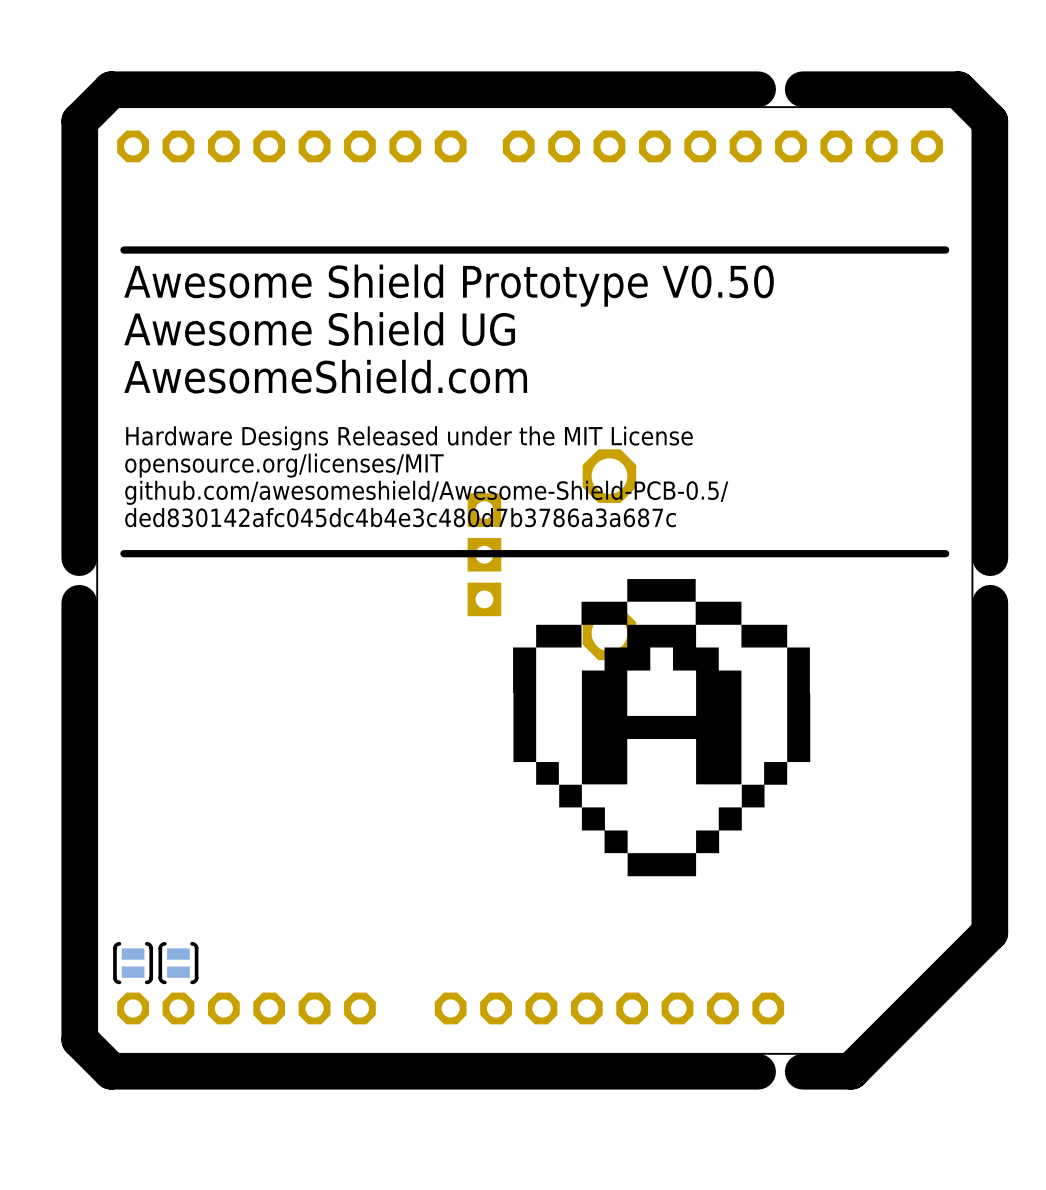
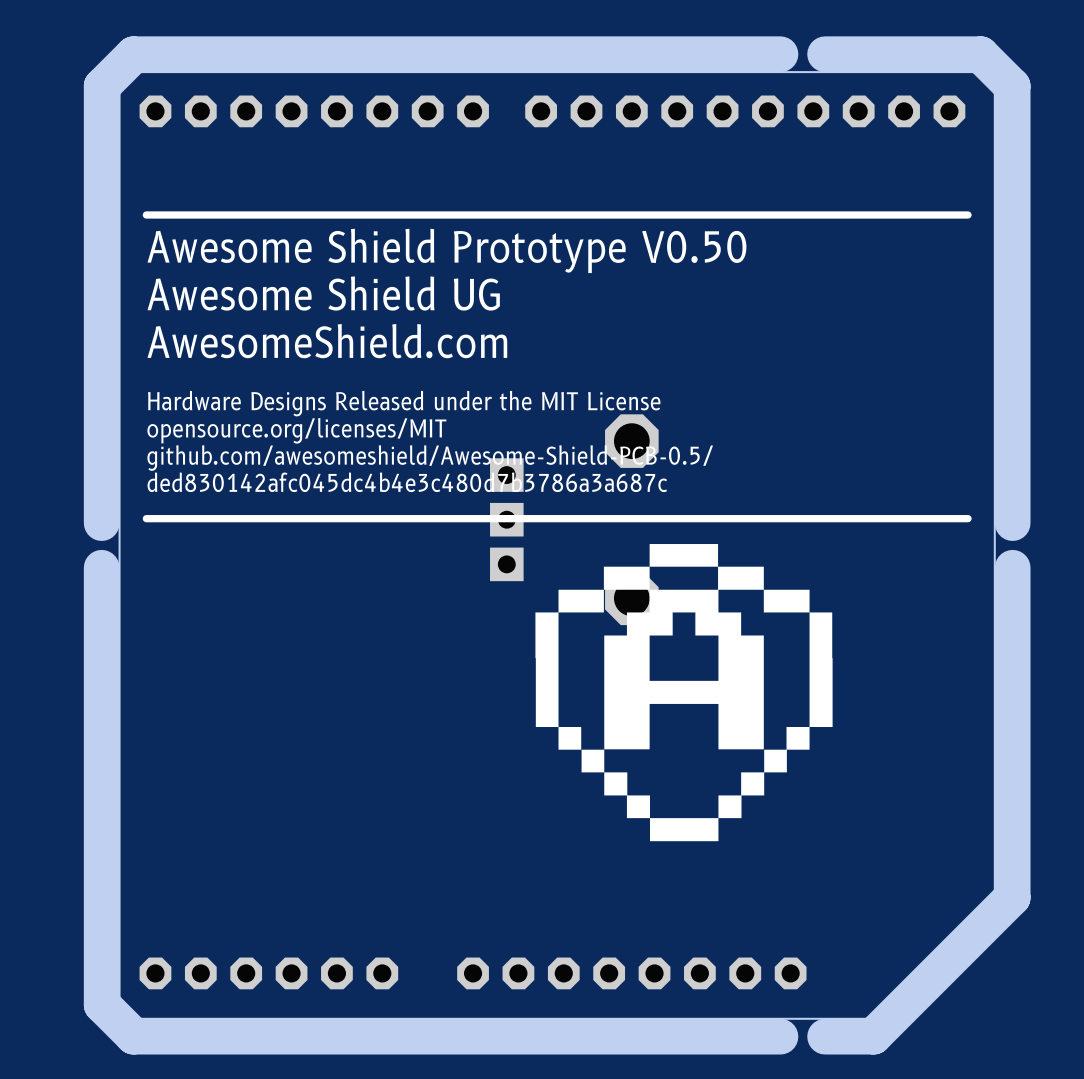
part: (133, 963) -> none
part: (178, 963) -> none

